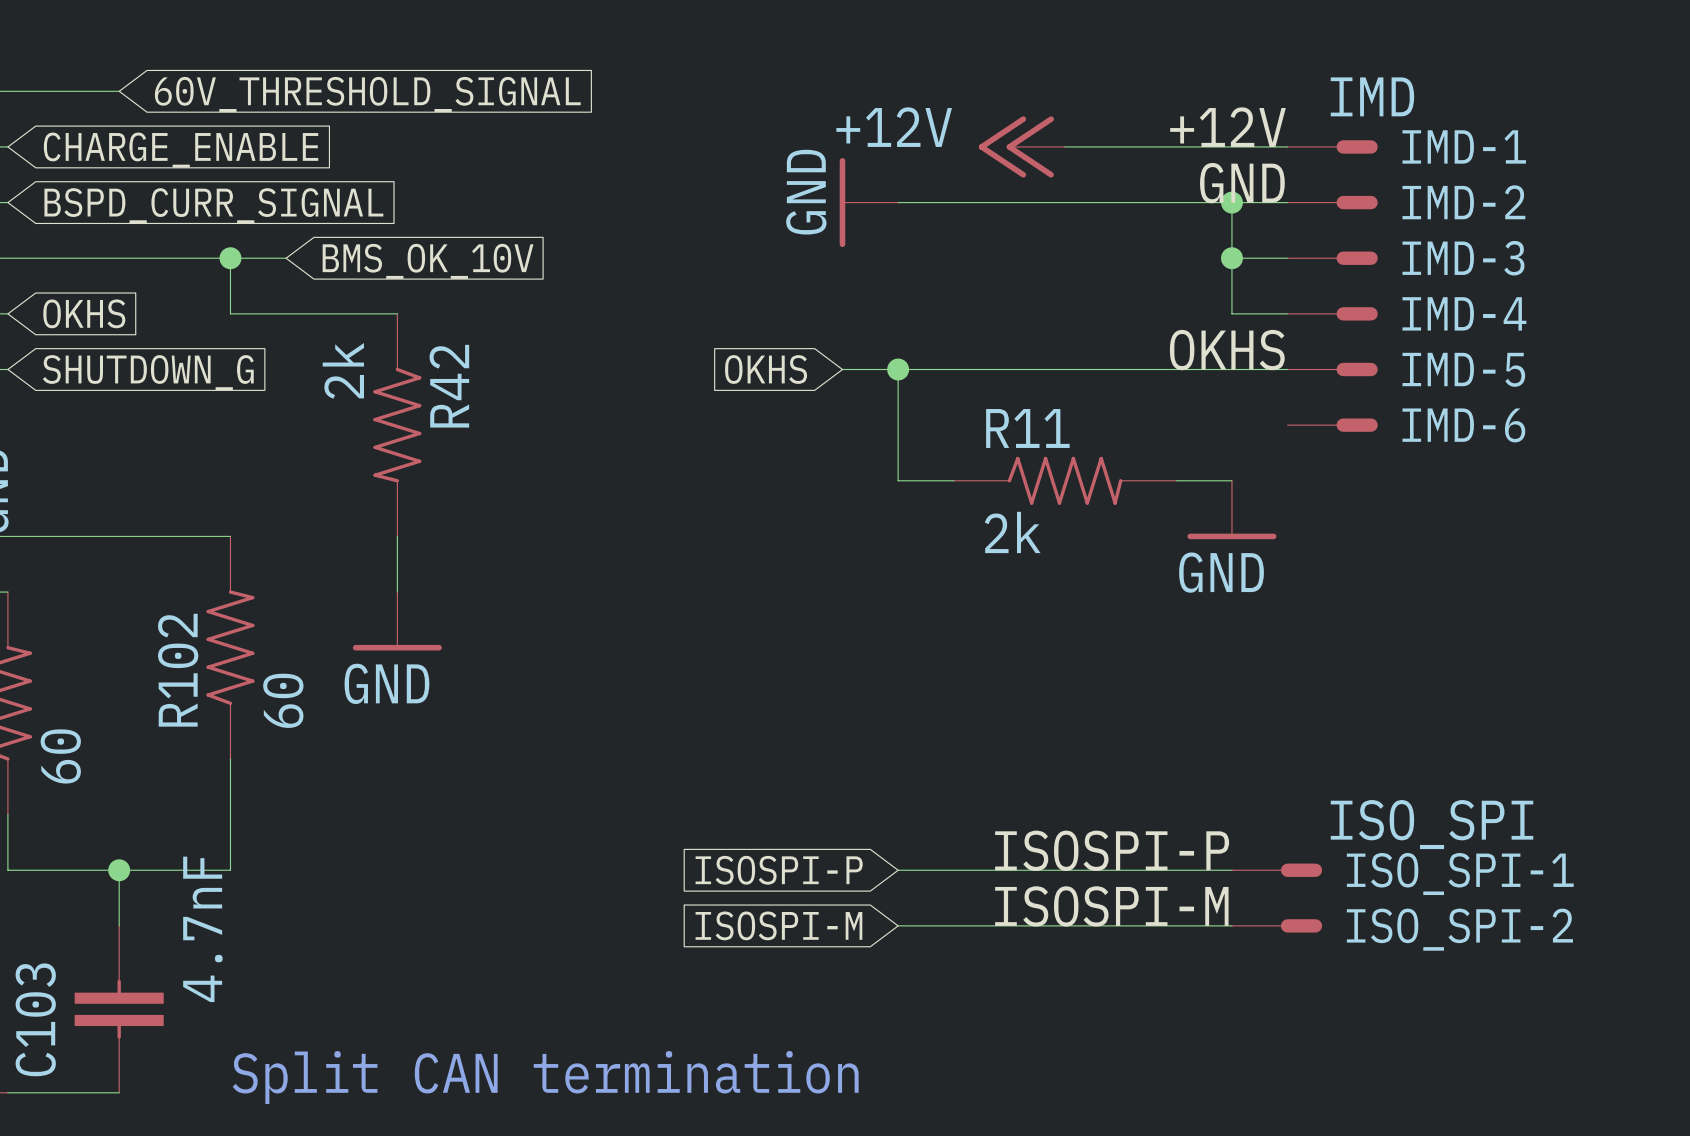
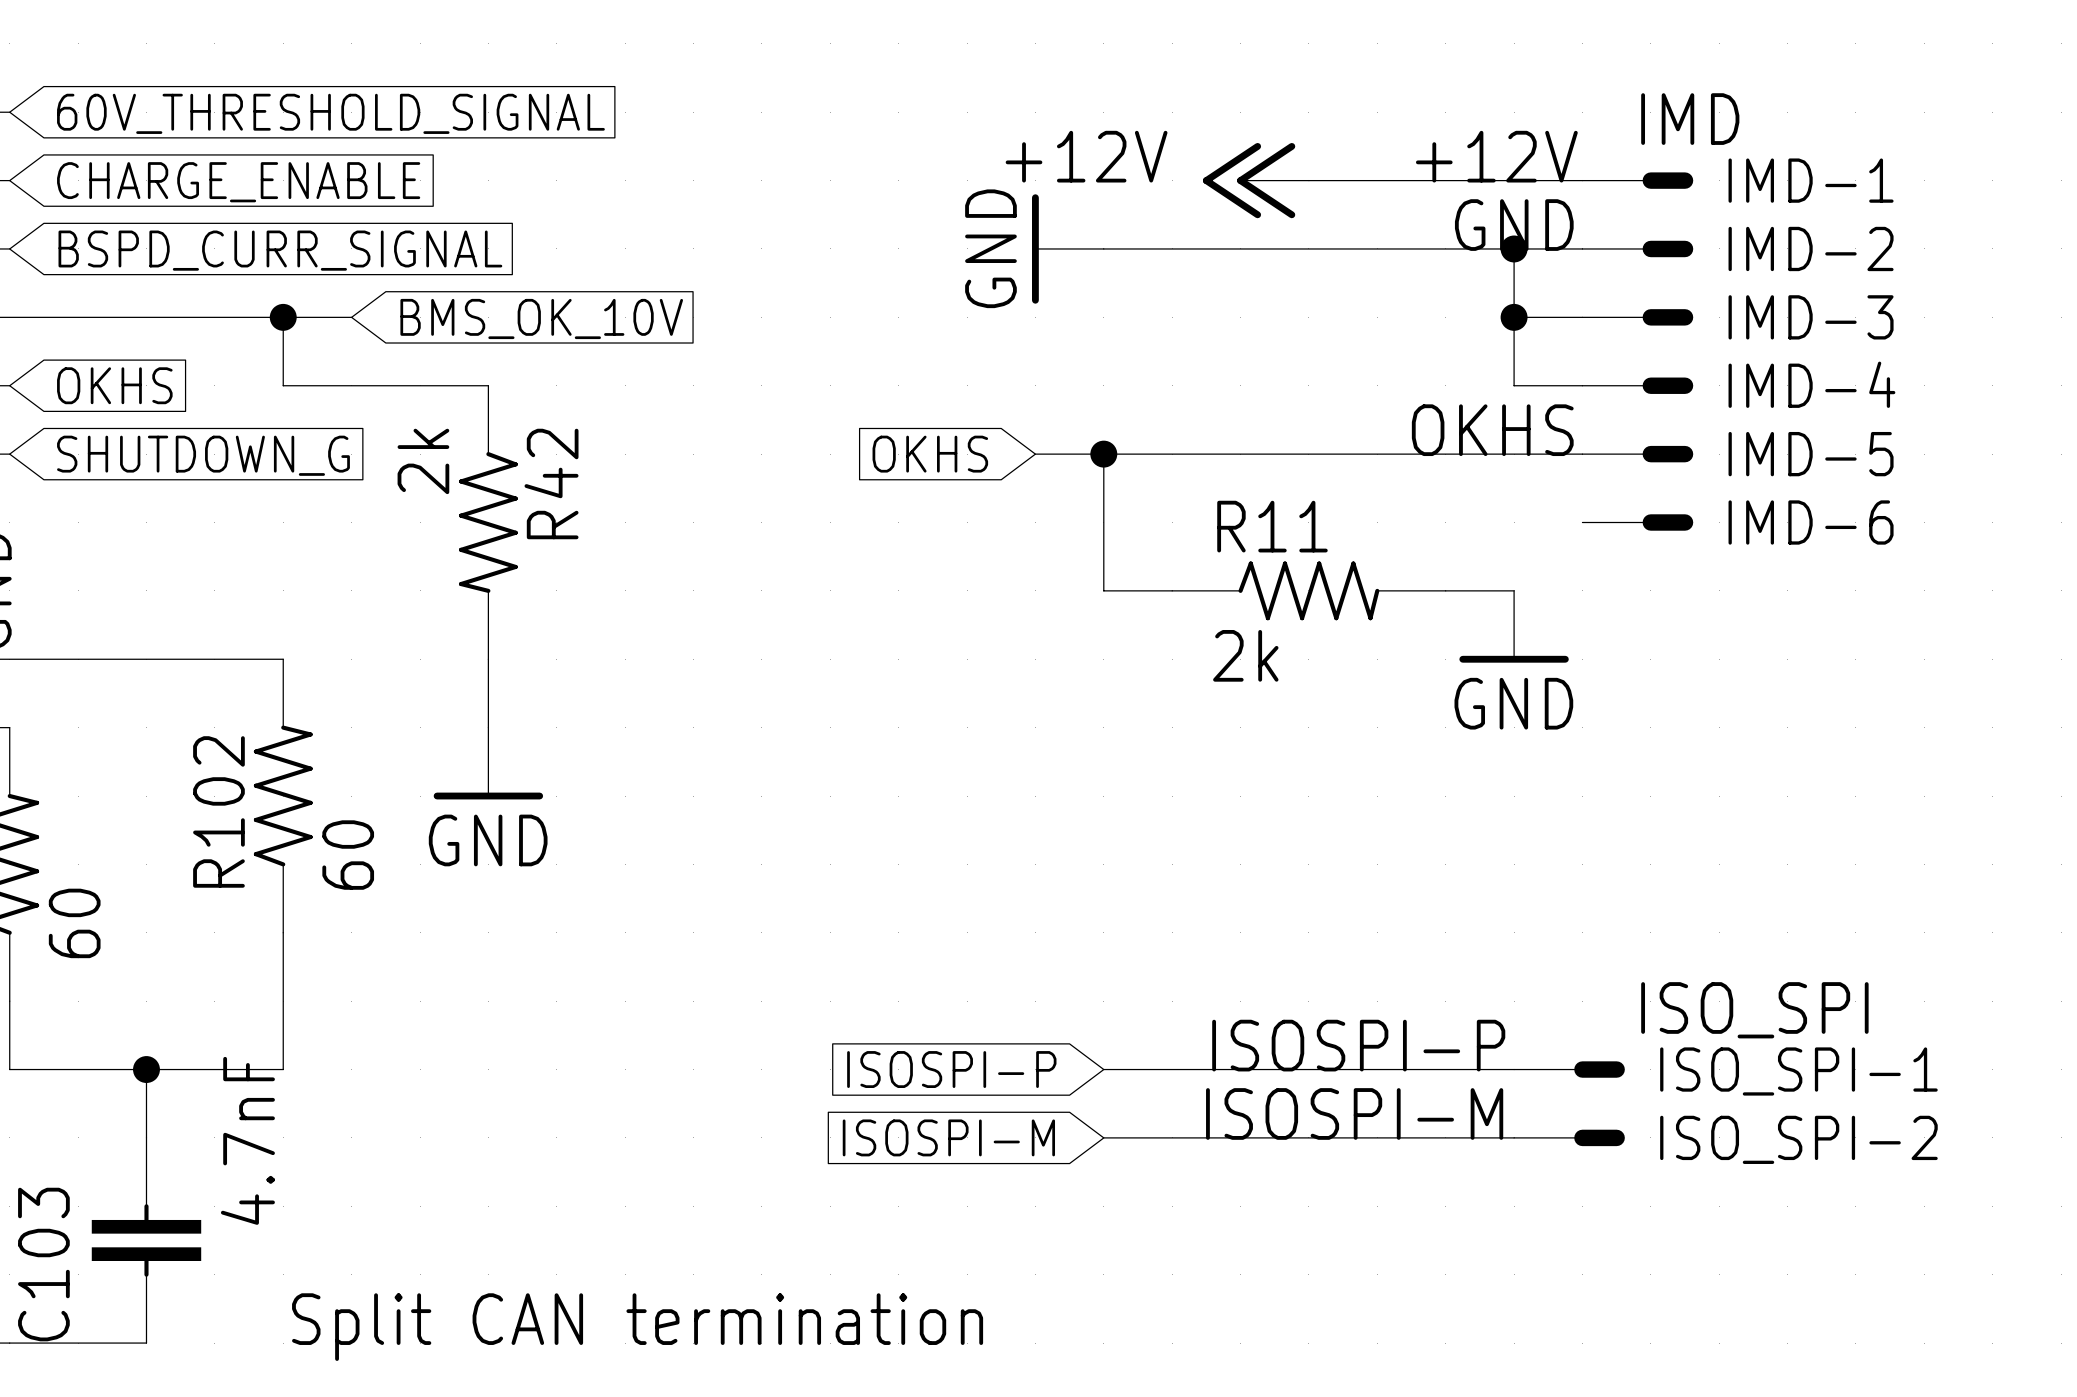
wire: (7, 91) (119, 91) -> none
global label position: 60V_THRESHOLD_SIGNAL (367, 94) -> 60V_THRESHOLD_SIGNAL (330, 113)

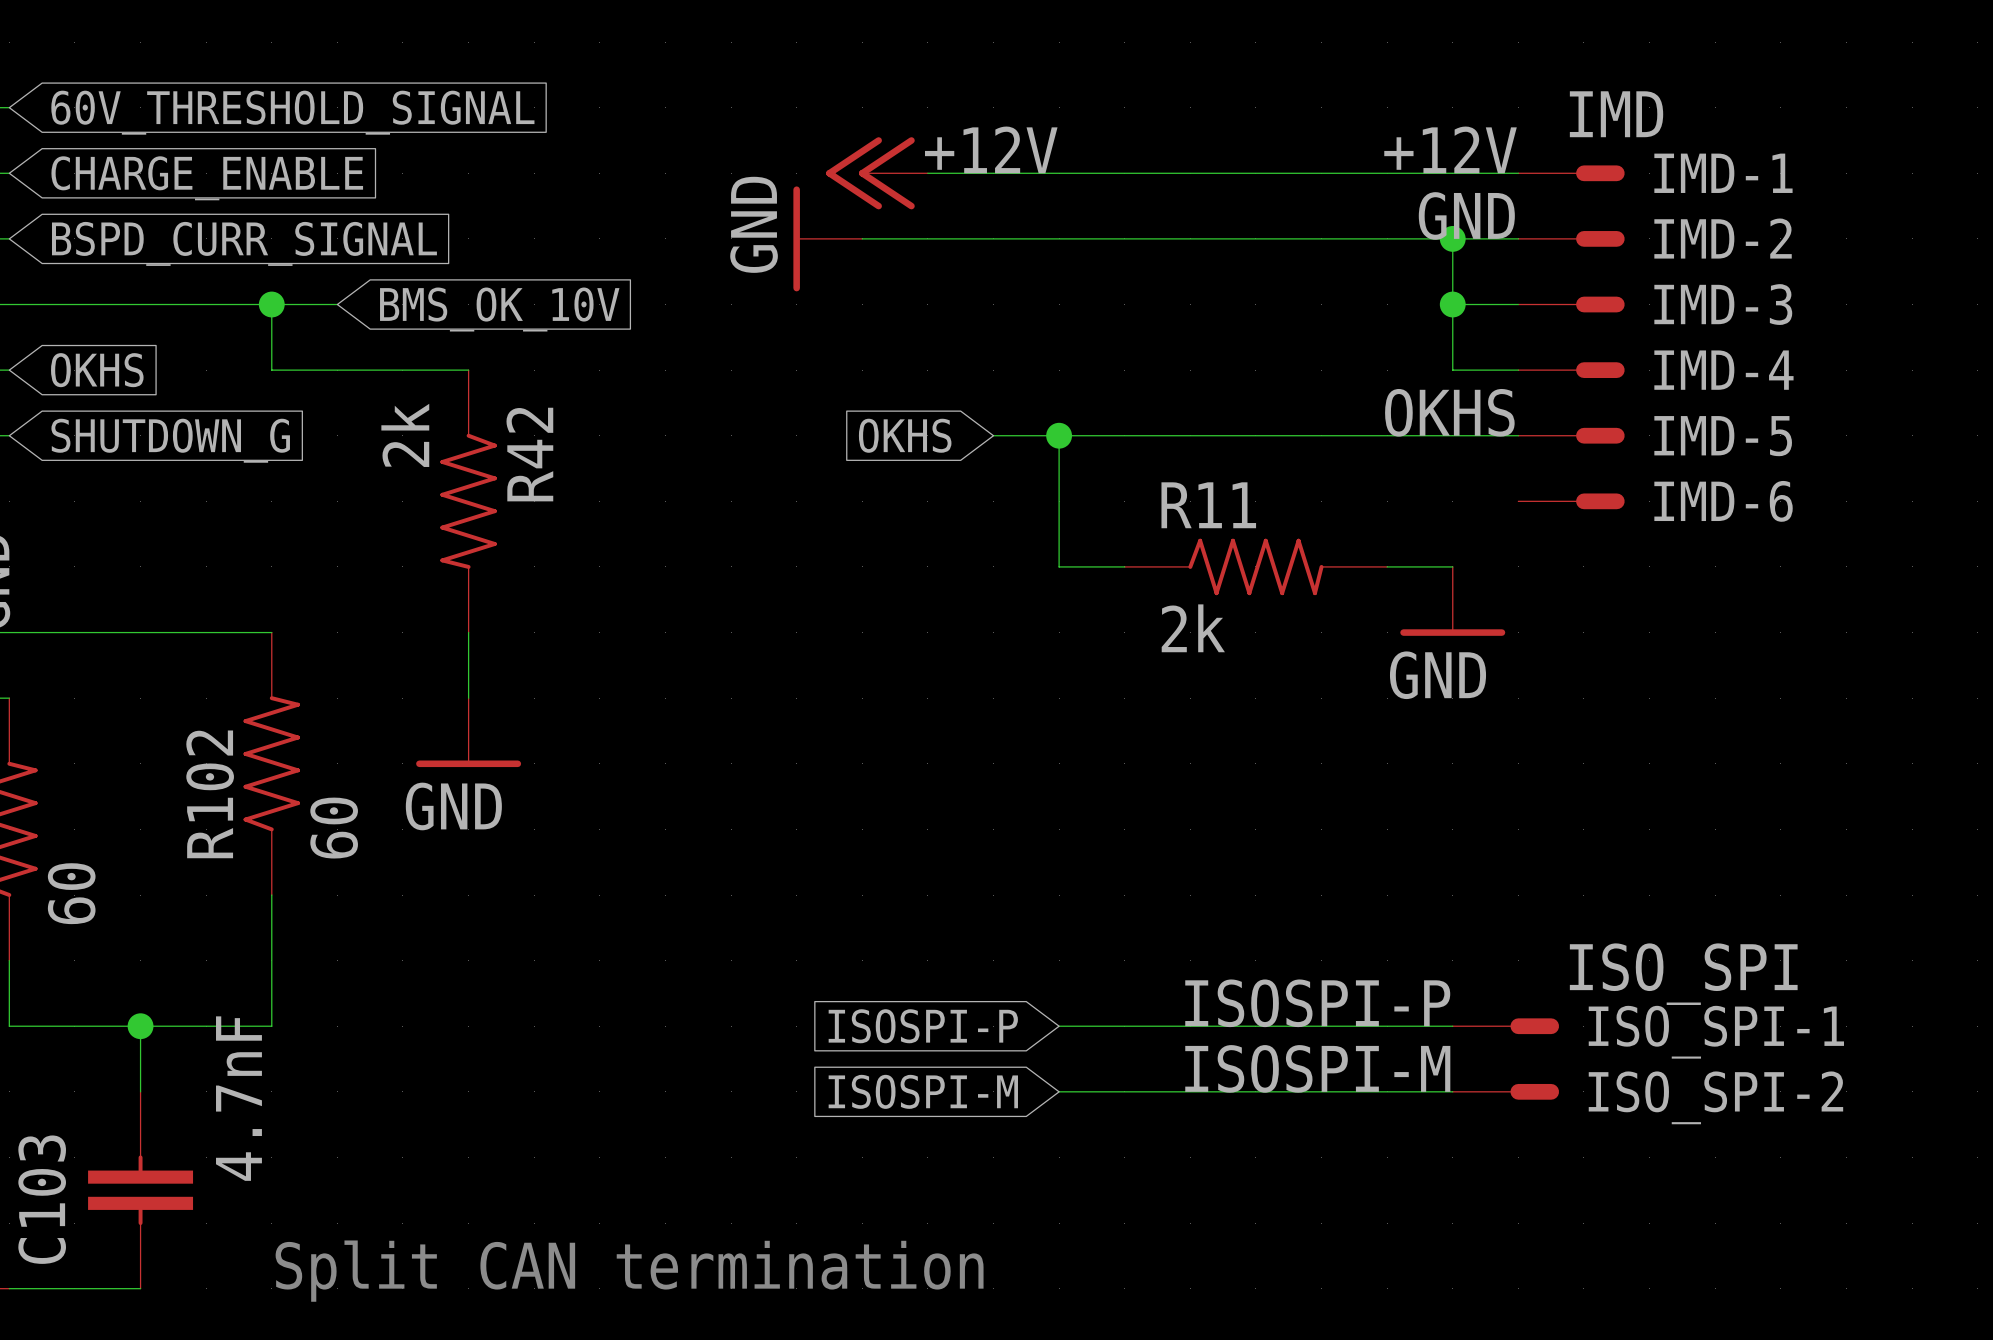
power symbol text position: +12V (1086, 156) -> +12V (991, 149)
wire: none -> (927, 173) (1255, 173)
power symbol position: +12V (1255, 180) -> +12V (877, 173)
wire: none -> (862, 238) (1059, 238)
power symbol position: GND (1067, 248) -> GND (827, 238)

